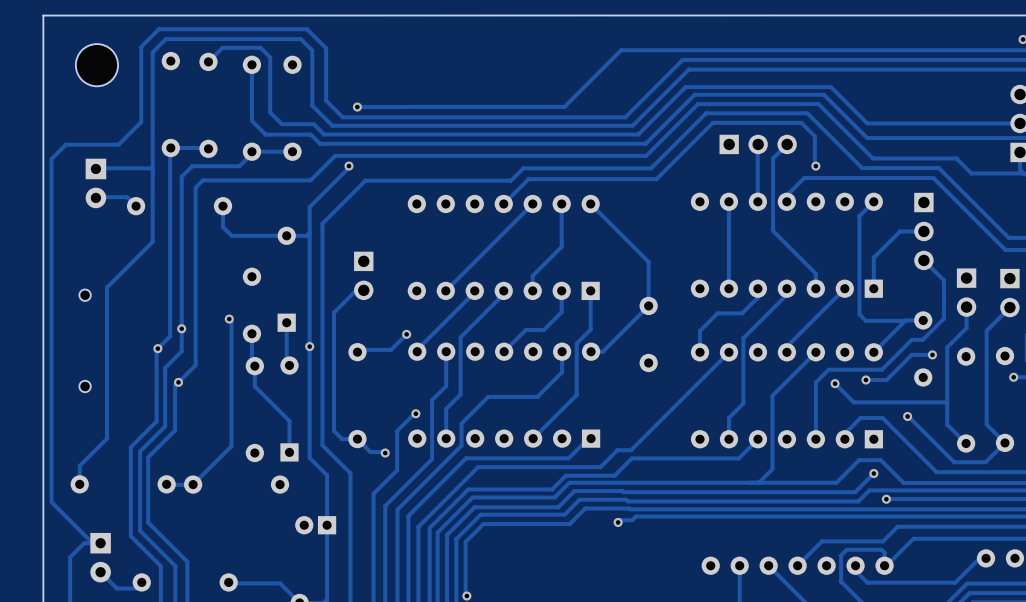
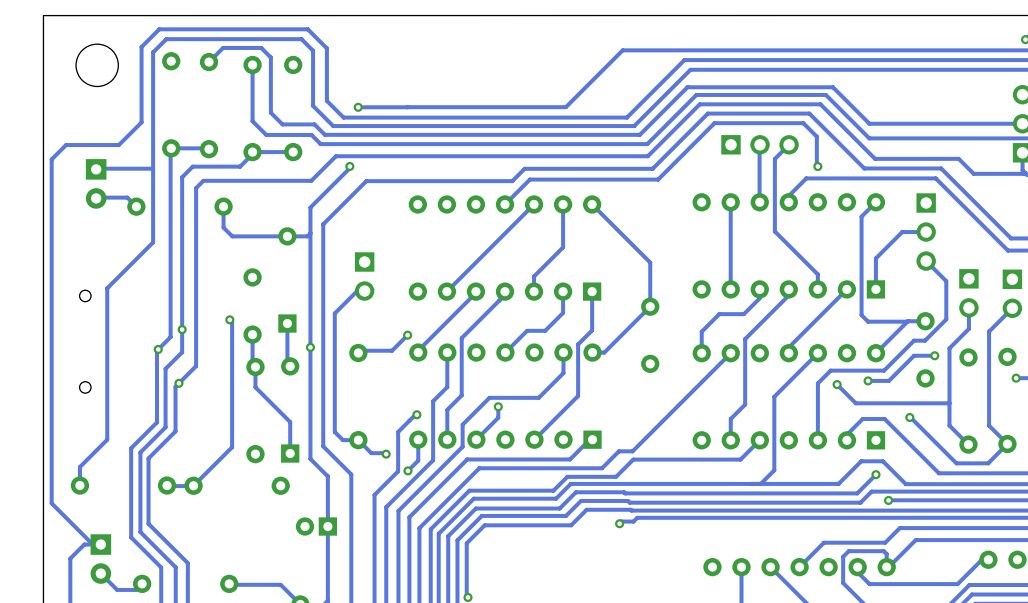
track: none -> (498, 406) (498, 417) (476, 439)
via: none -> (498, 406)
track: none -> (418, 439) (418, 460) (407, 470)
via: none -> (407, 470)

